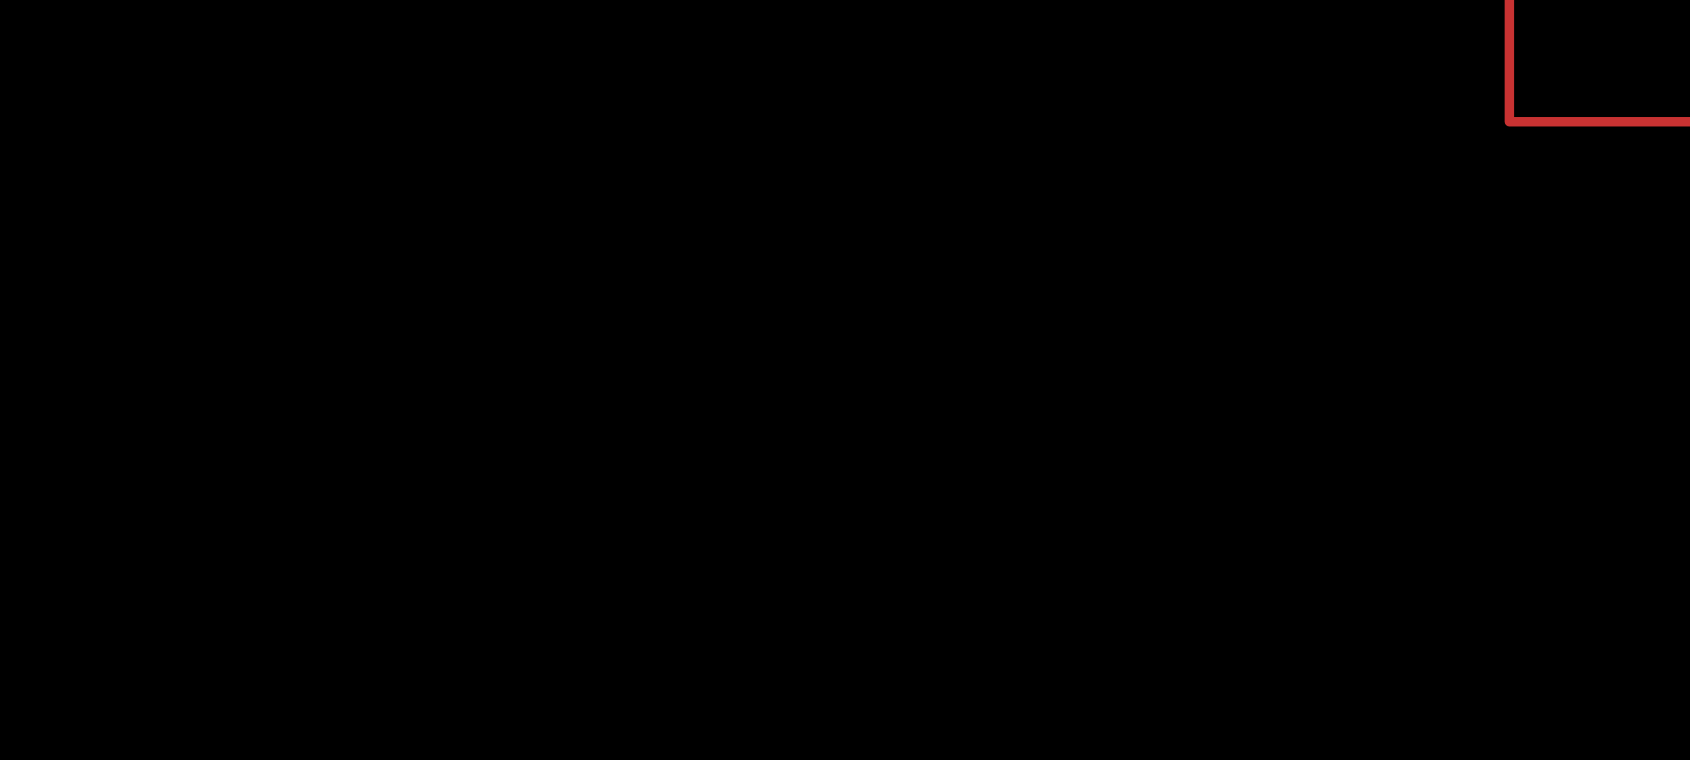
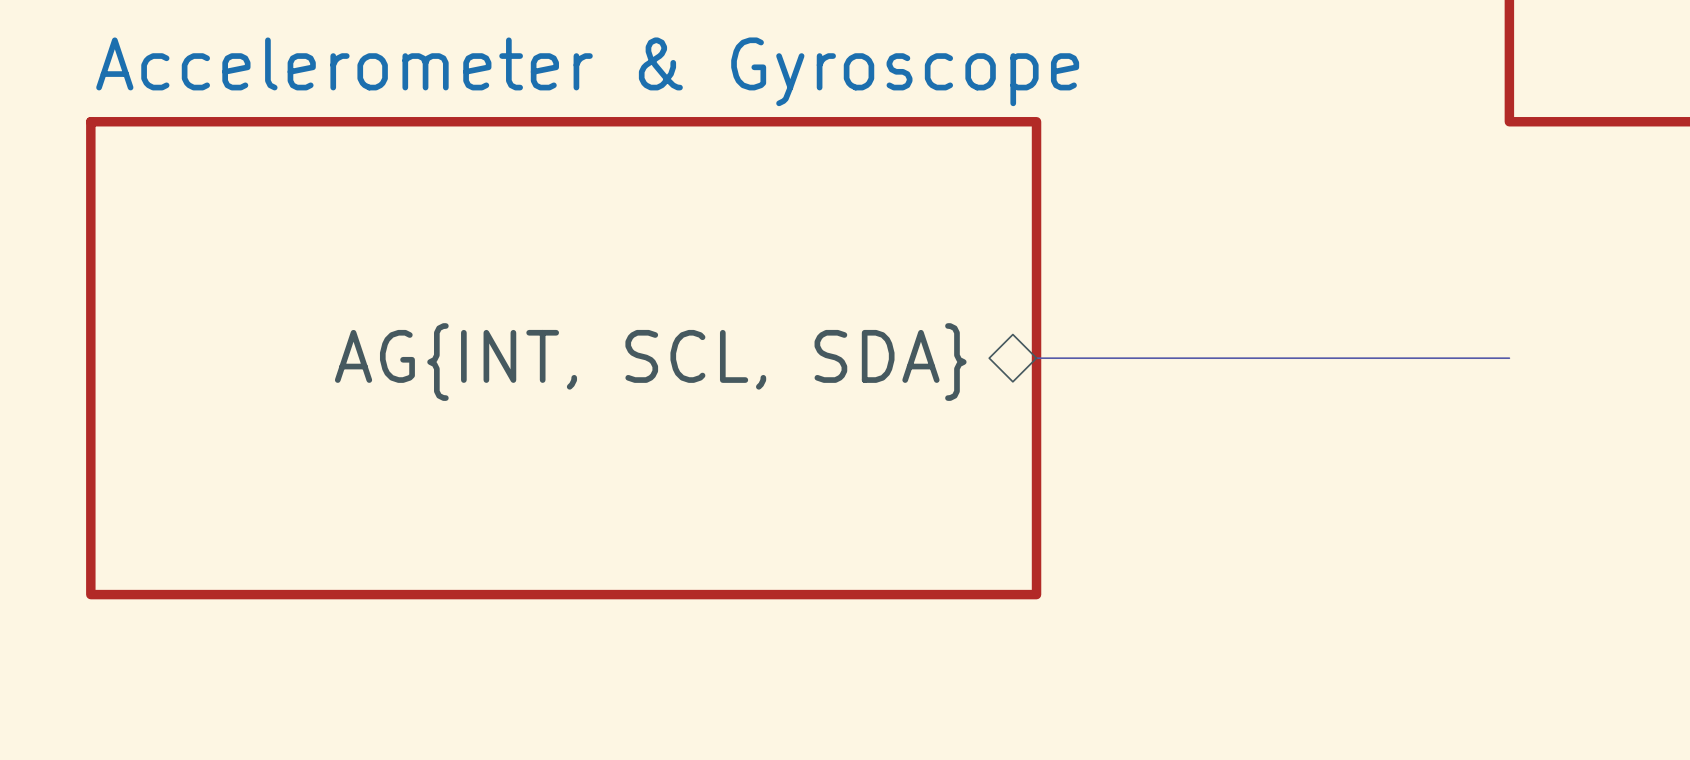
sheet Accelerometer & Gyroscope: none -> (563, 358)
bus: none -> (1036, 358) (1509, 358)
sheet pin: none -> AG{INT, SCL, SDA} (650, 362)

